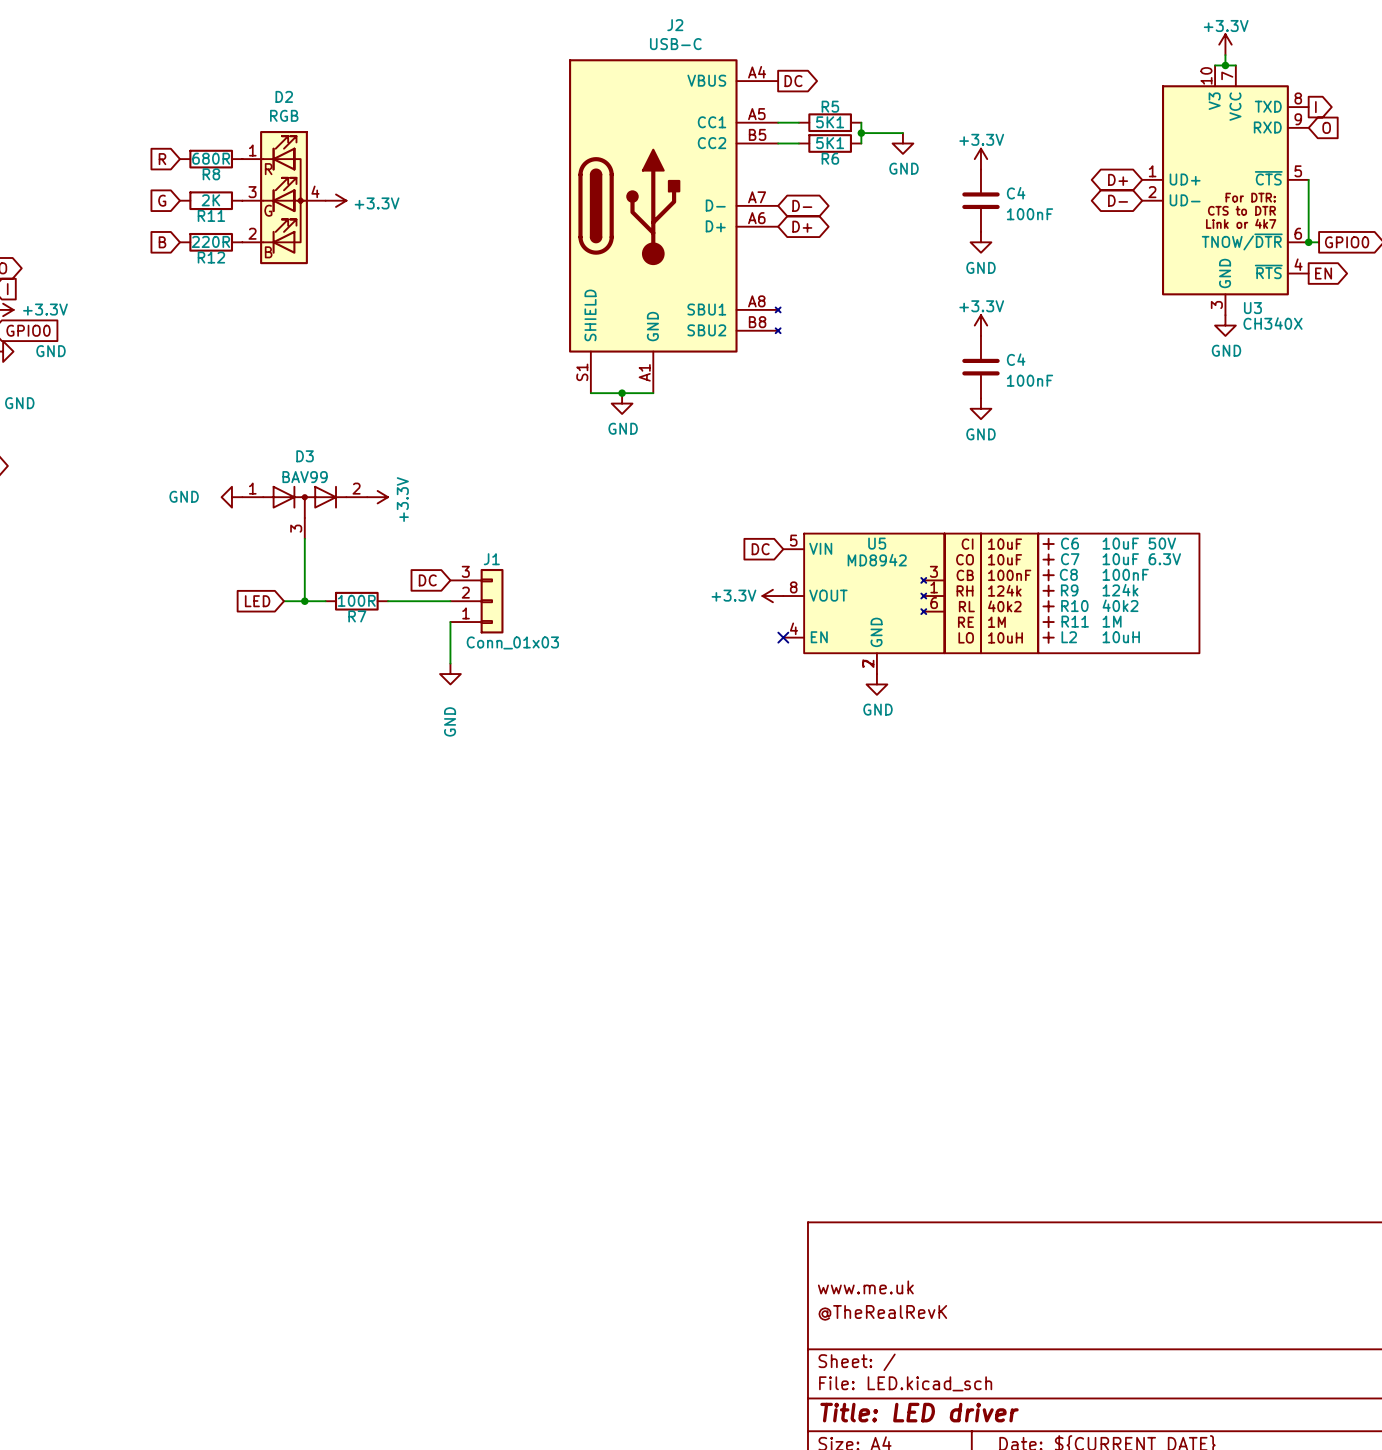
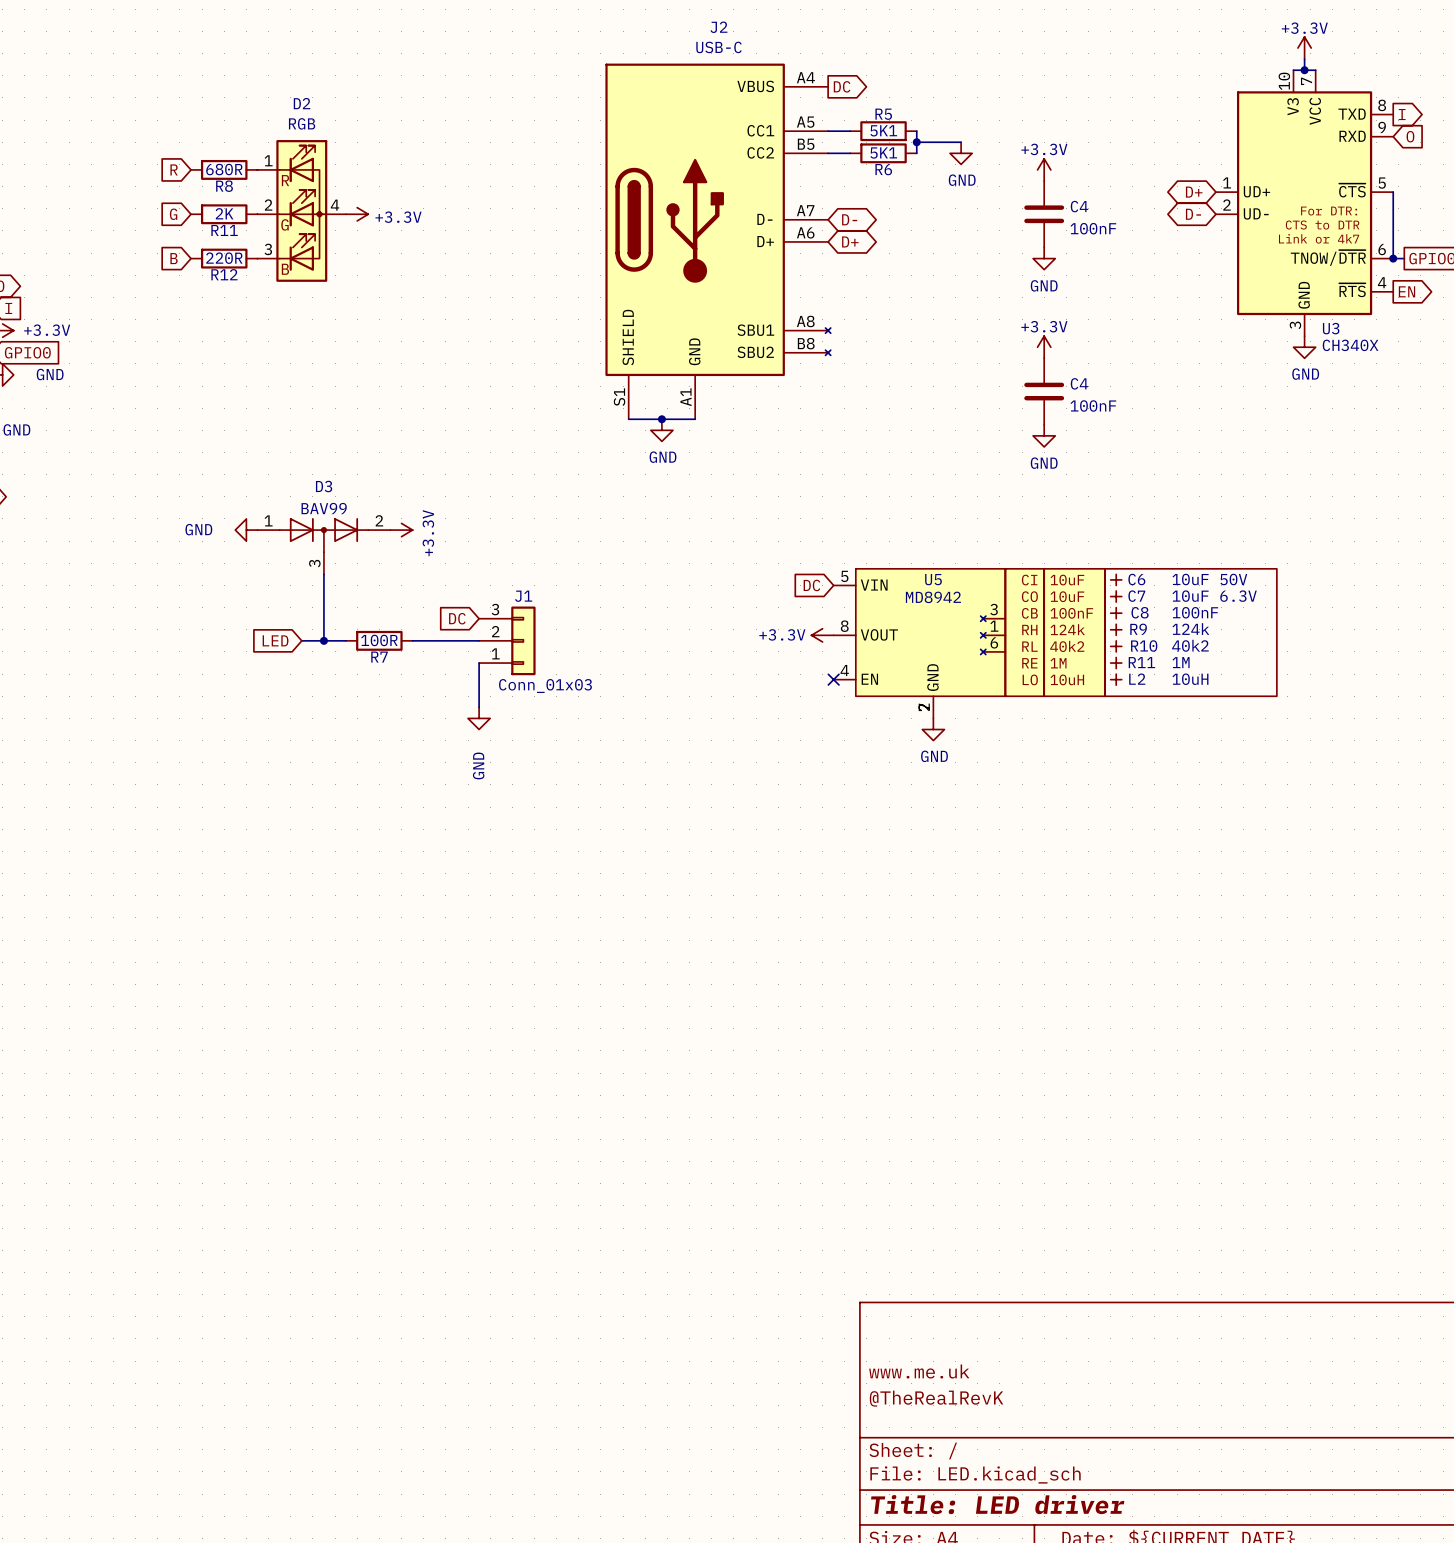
D2 pin number: 3 (252, 192) -> 2 (268, 205)
D2 pin number: 2 (252, 233) -> 3 (268, 249)

